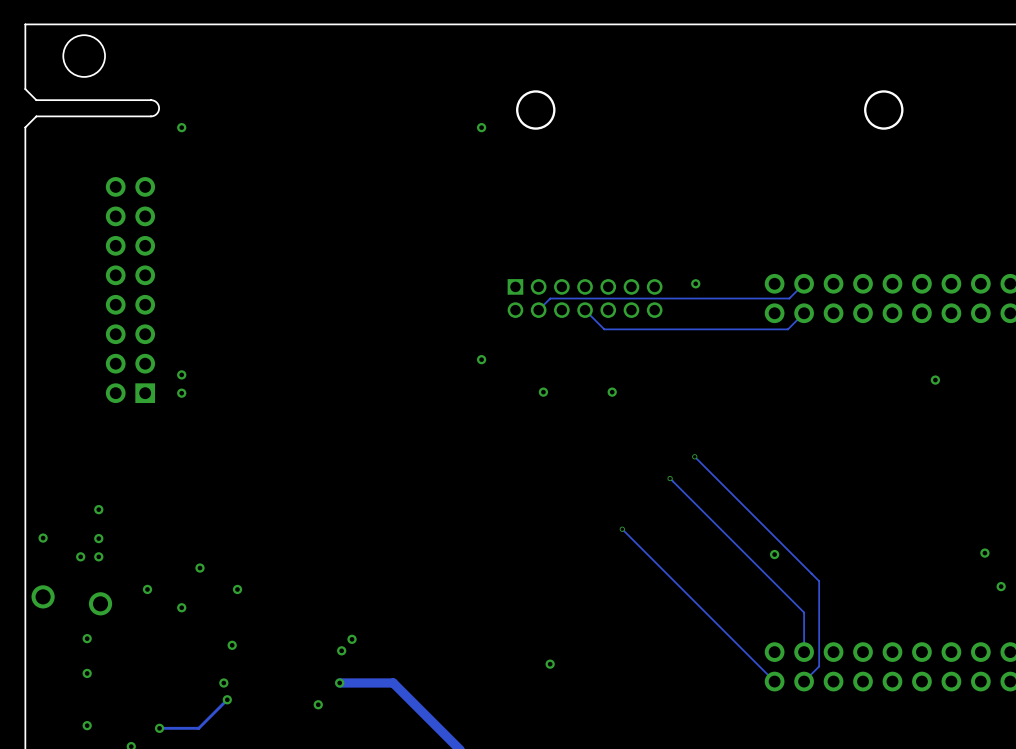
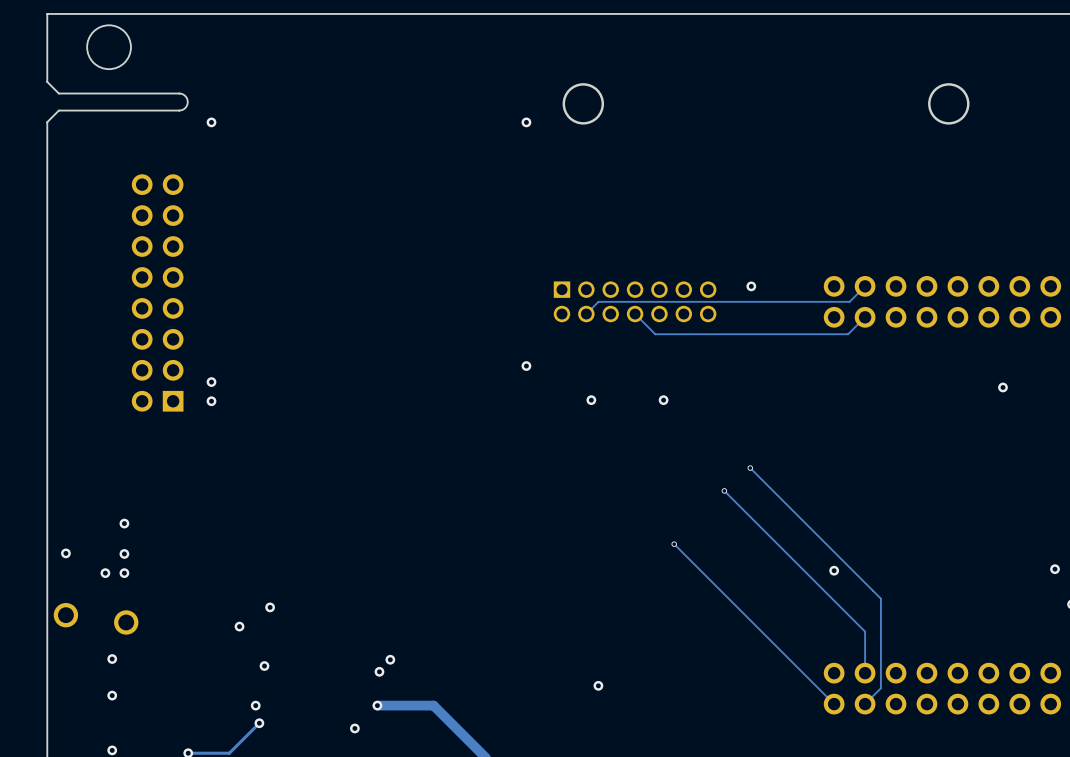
via: (199, 568) -> none
via: (147, 589) -> none
via: (181, 607) -> none
via: none -> (239, 626)

